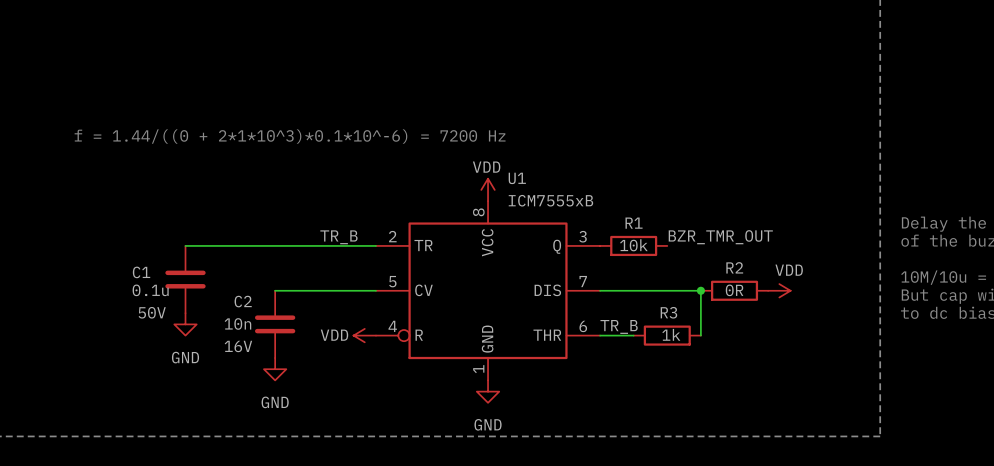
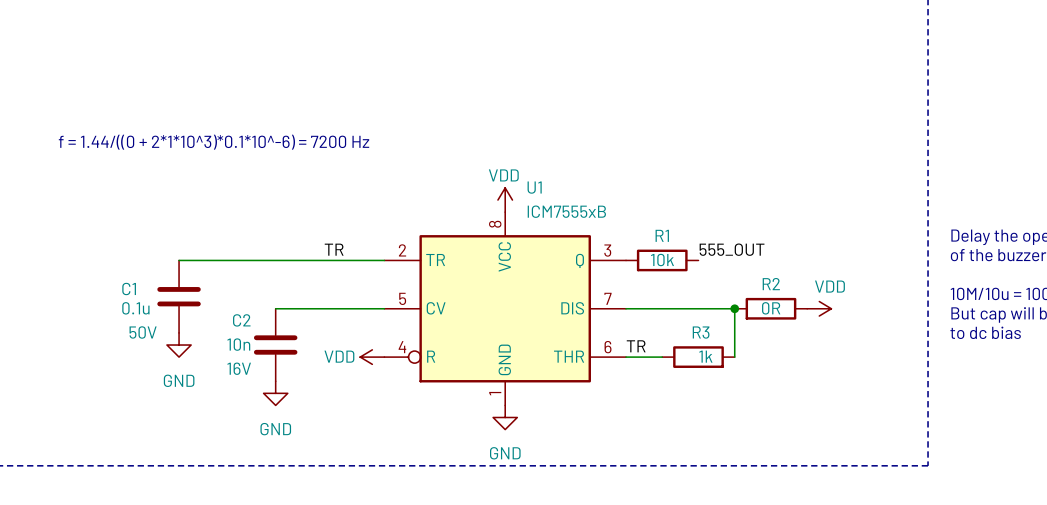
label: TR_B (338, 237) -> TR (334, 249)
label: BZR_TMR_OUT (720, 237) -> 555_OUT (732, 249)
label: TR_B (619, 326) -> TR (636, 346)

